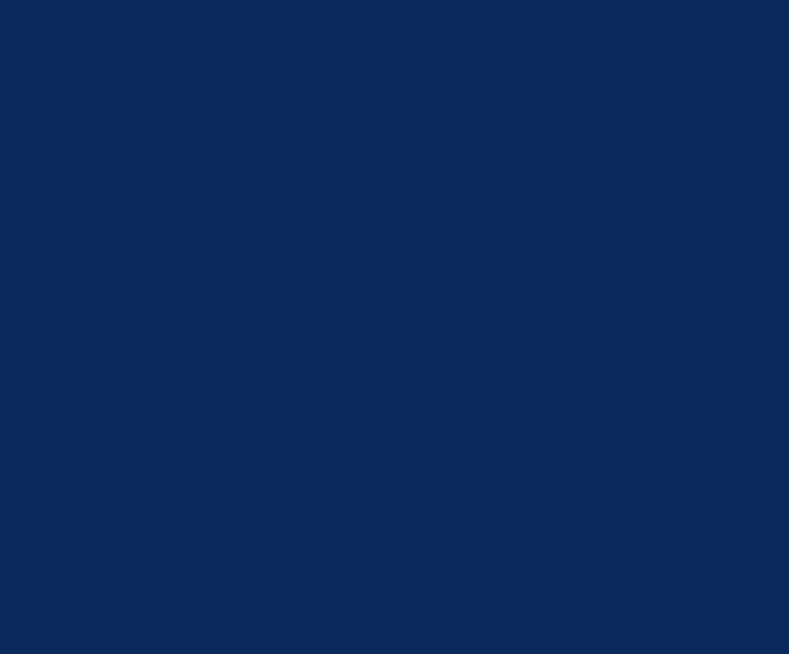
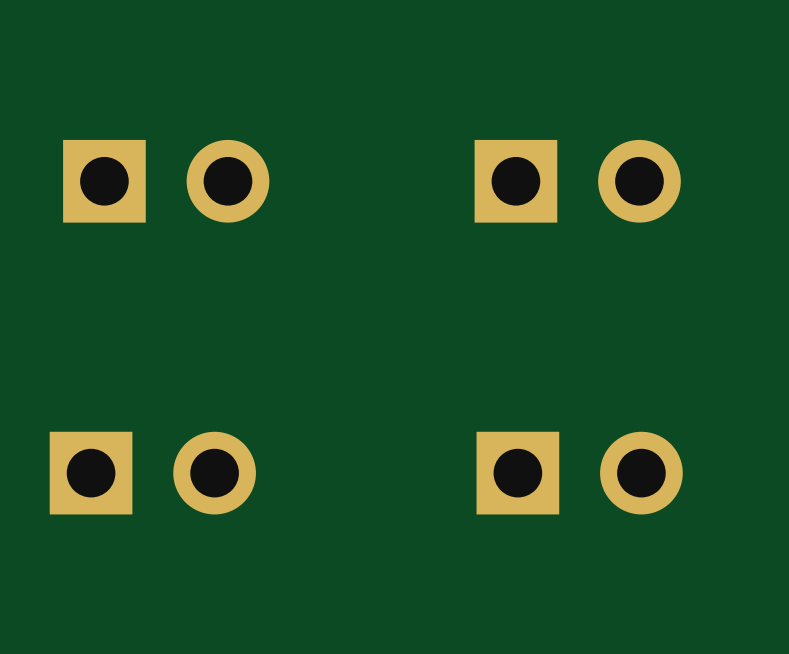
part: none -> (166, 181)
part: none -> (577, 181)
part: none -> (152, 473)
part: none -> (579, 473)

